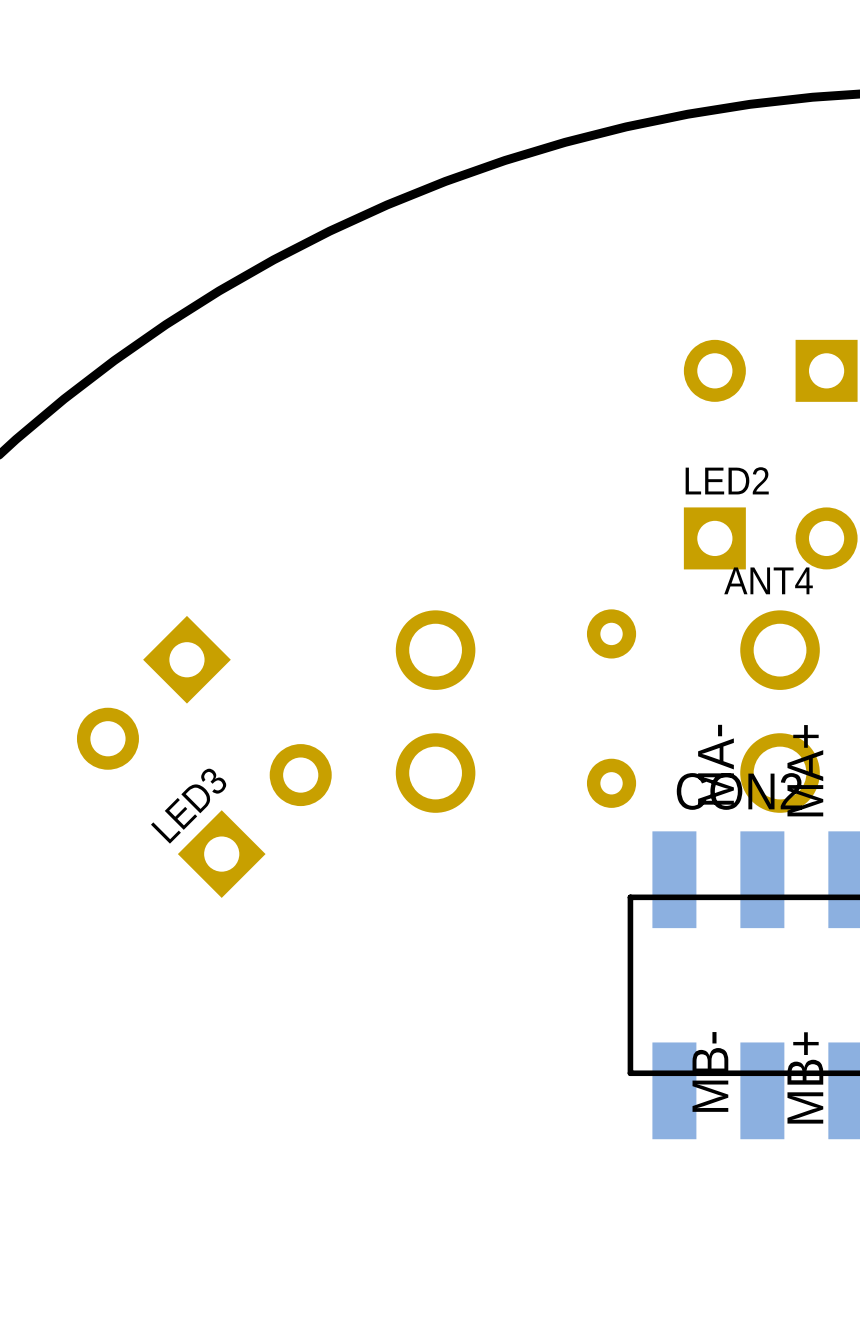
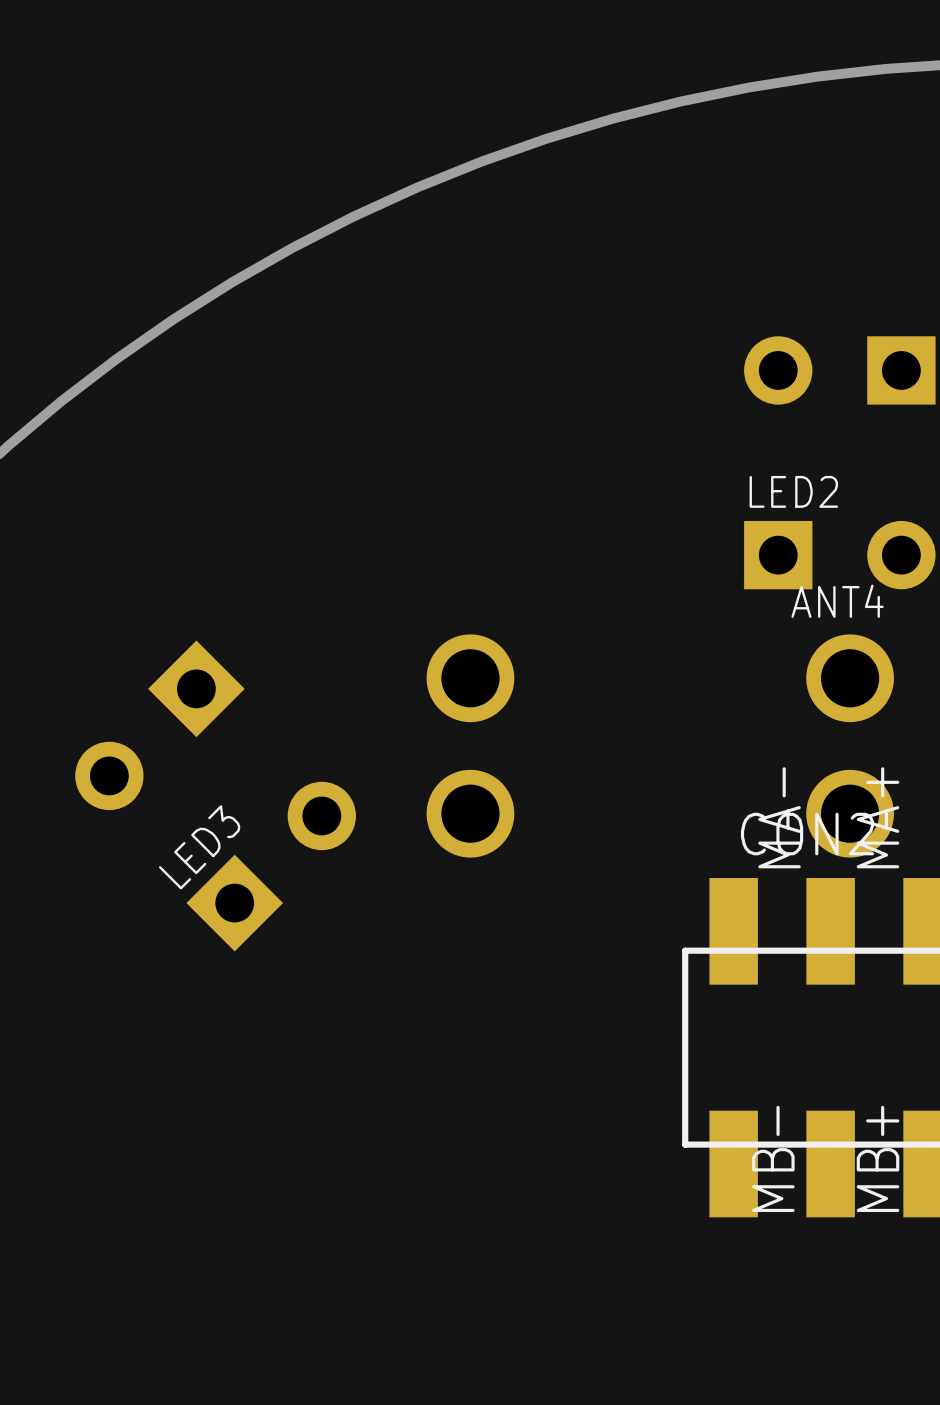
part: (611, 708) -> none

